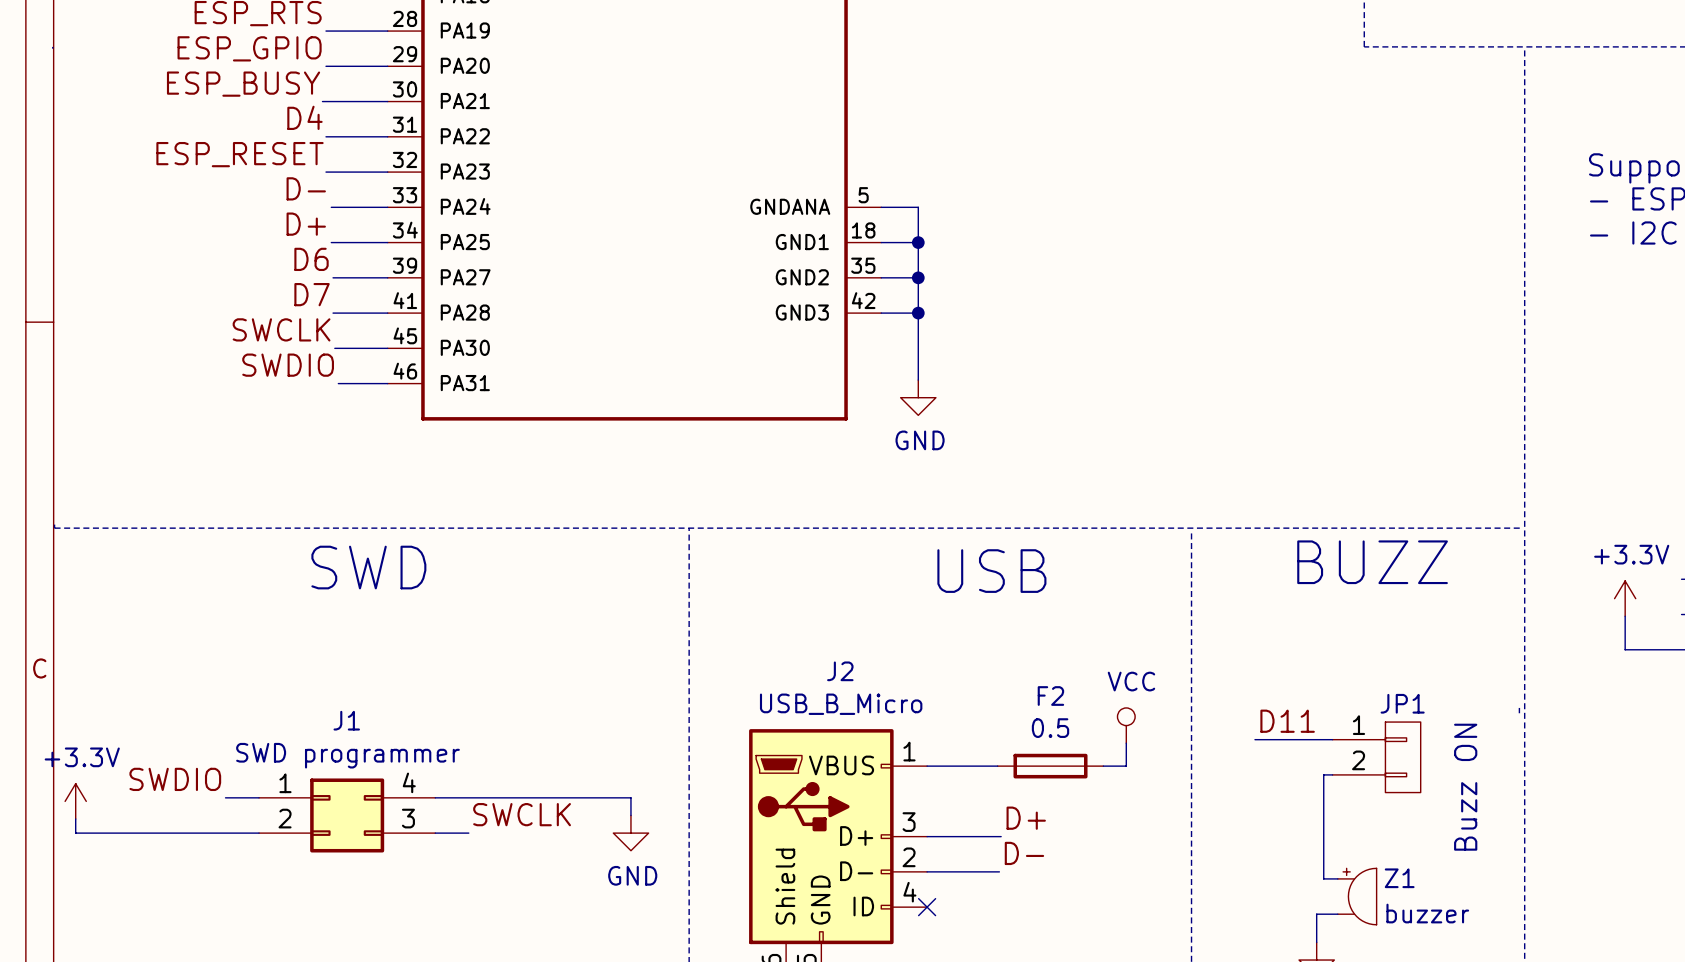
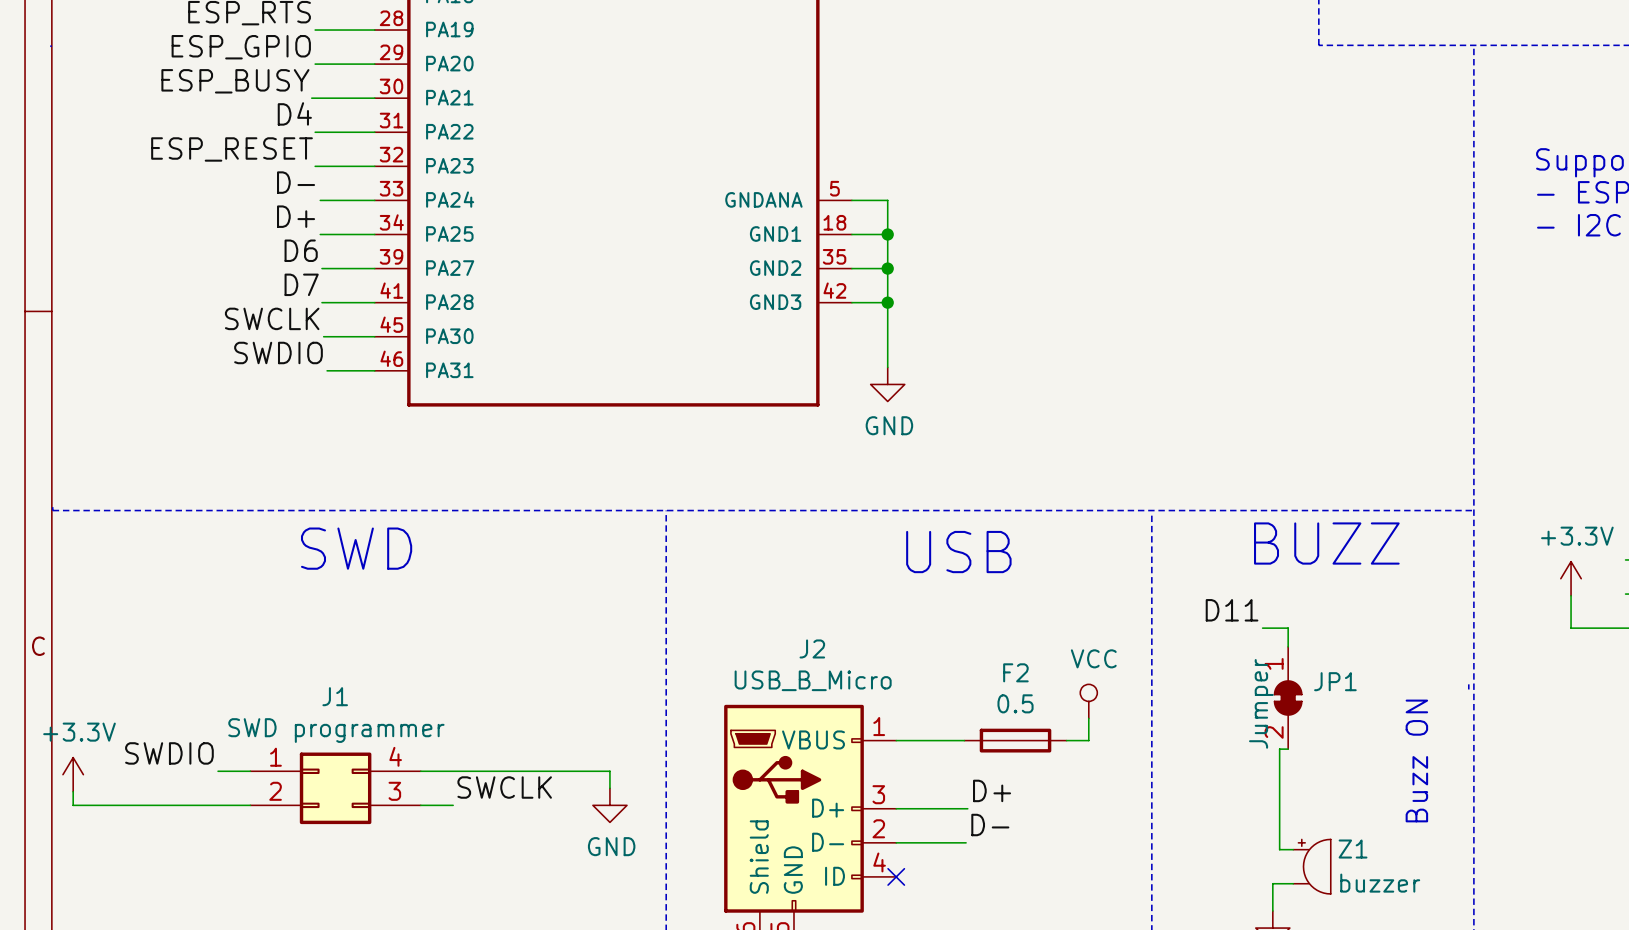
wire: none -> (1262, 628) (1288, 628) (1288, 646)
JP1 name position: JP1 (1402, 703) -> JP1 (1335, 681)
label position: D11 (1287, 721) -> D11 (1232, 610)
JP1 symbol: [1332, 722, 1421, 793] -> [1274, 646, 1302, 750]
JP1 value: none -> Jumper (1261, 703)
wire: (1254, 739) (1332, 739) -> none

